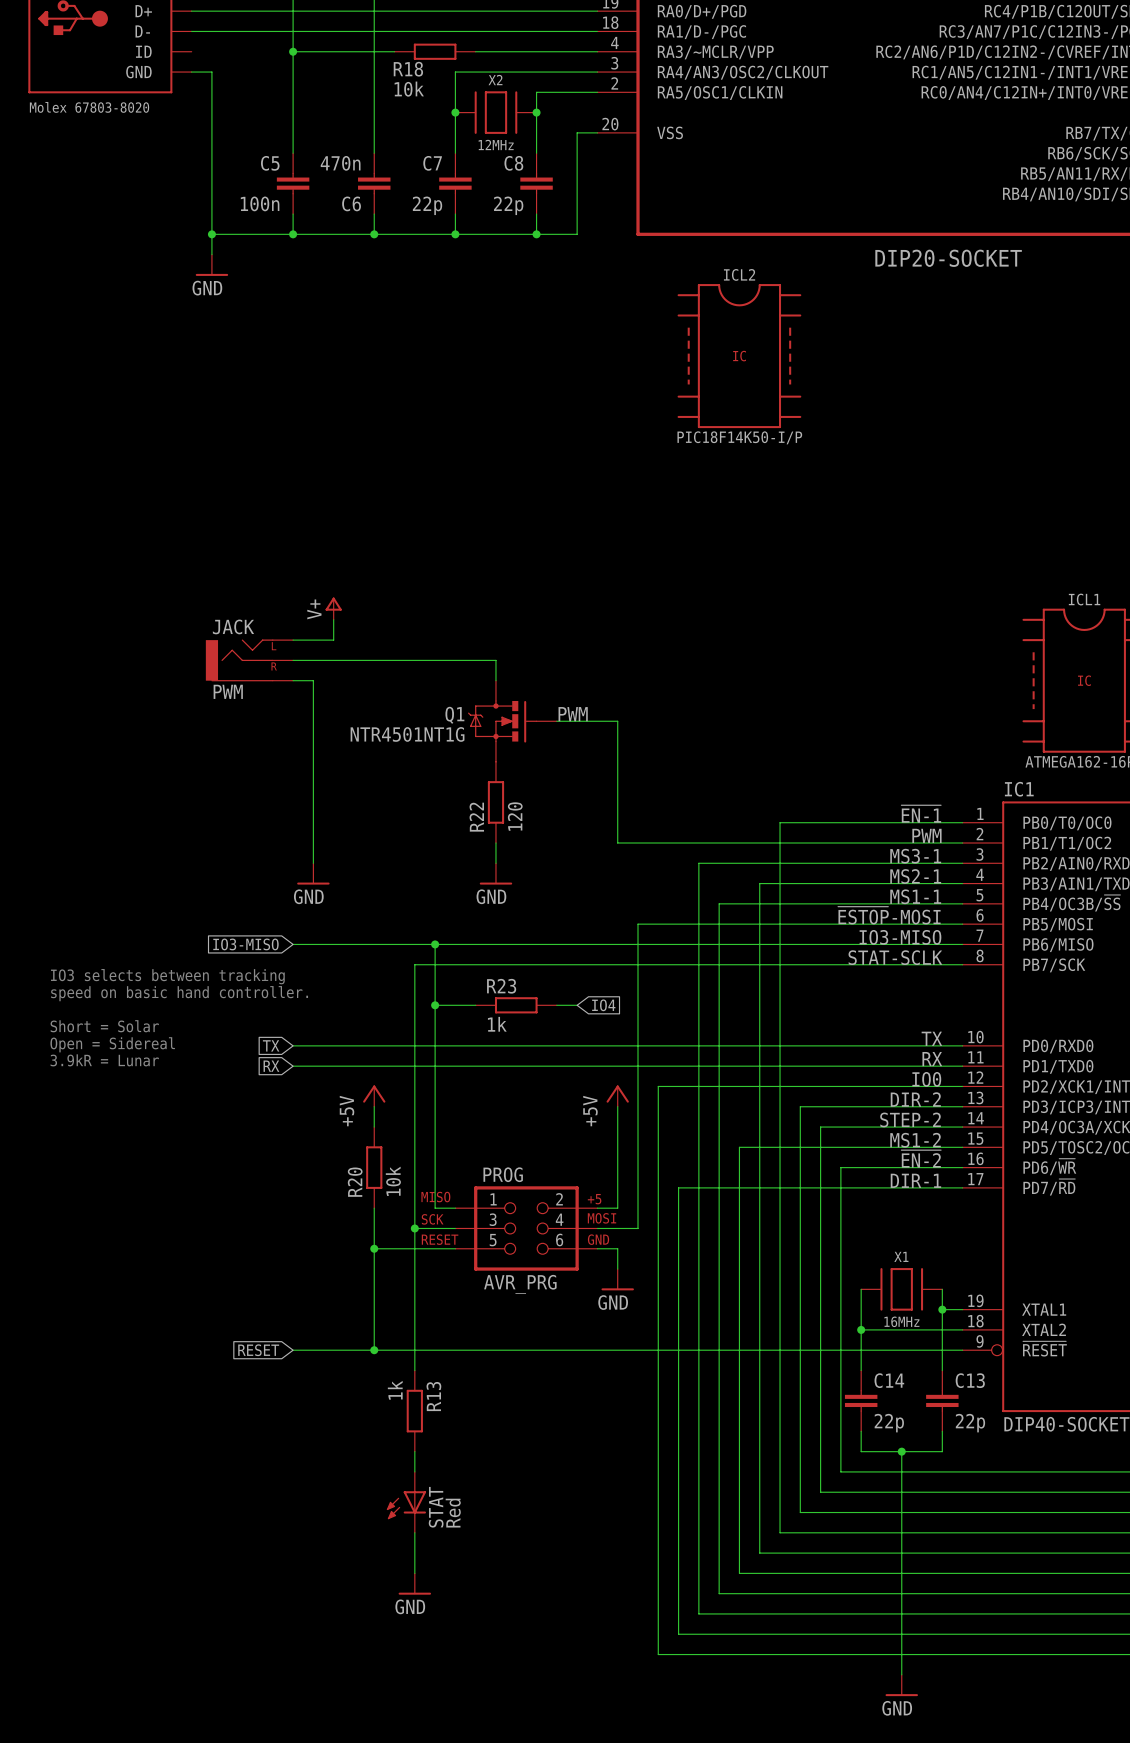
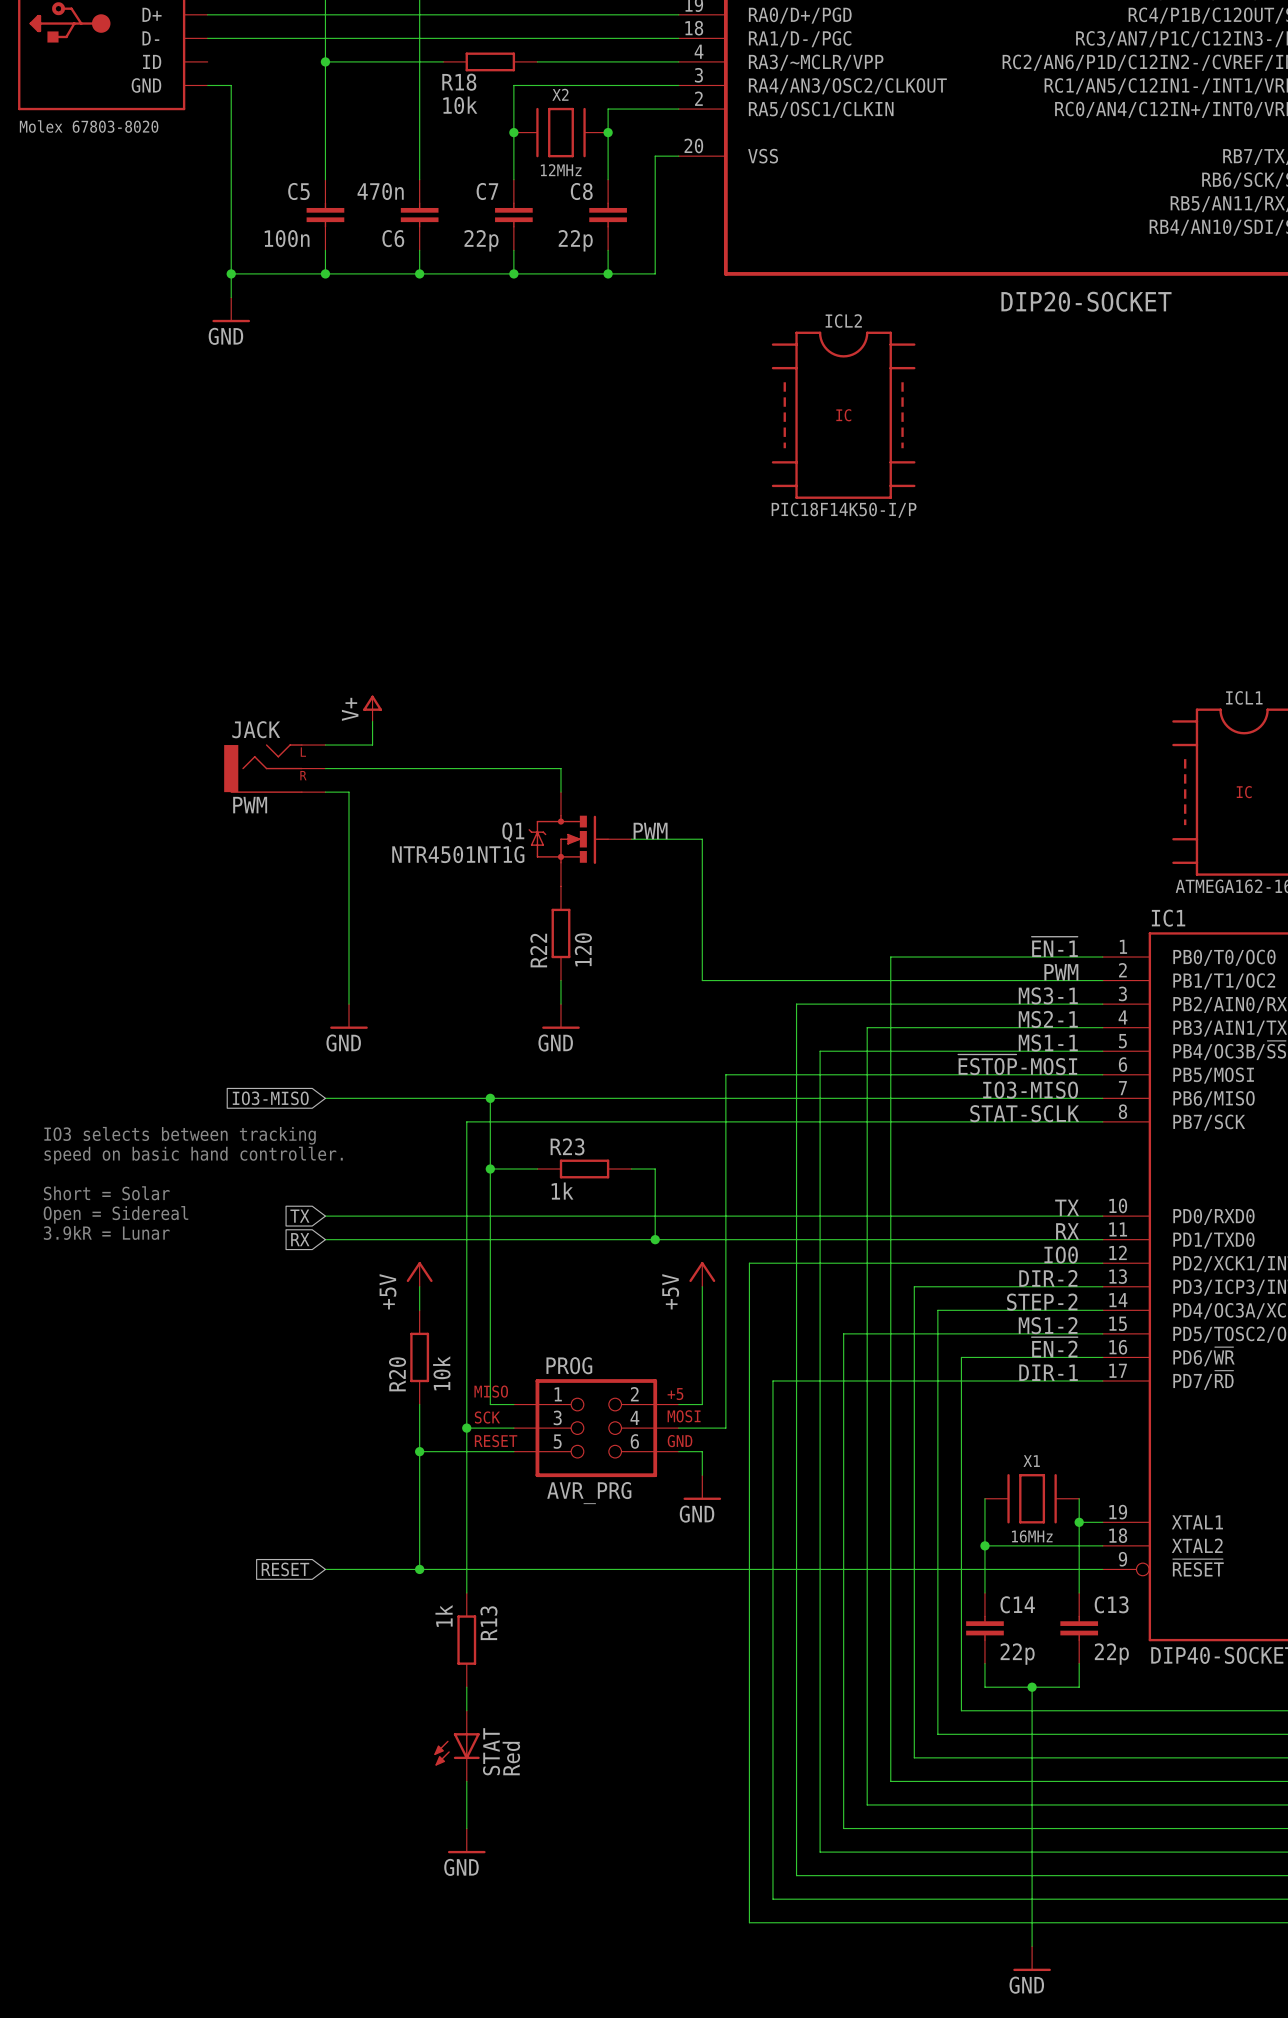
wire: none -> (655, 1169) (655, 1239)
global label: IO4 (603, 1005) -> none
junction: none -> (655, 1239)

